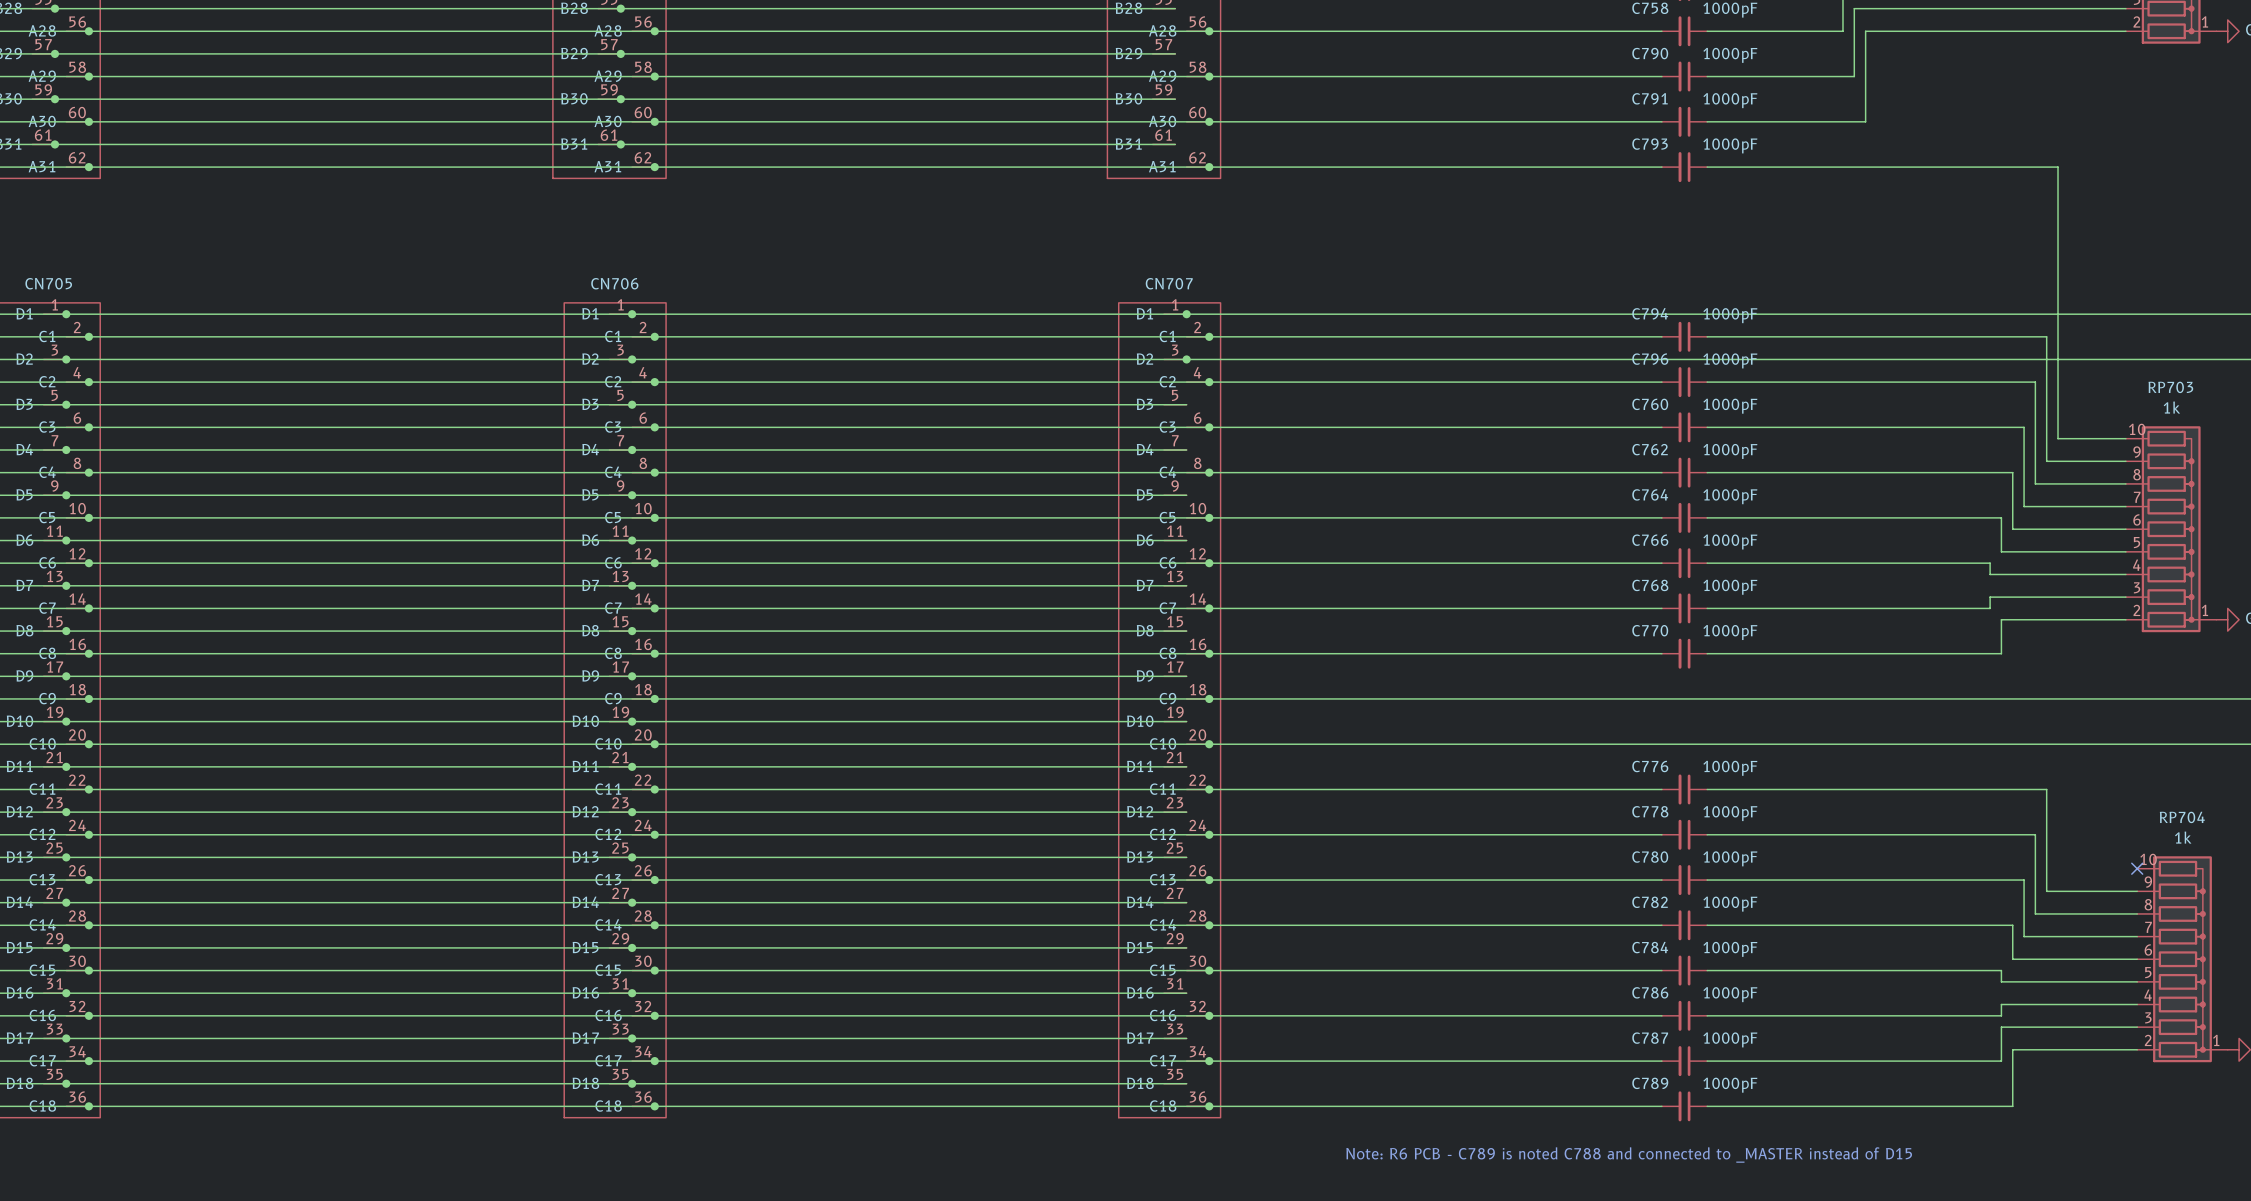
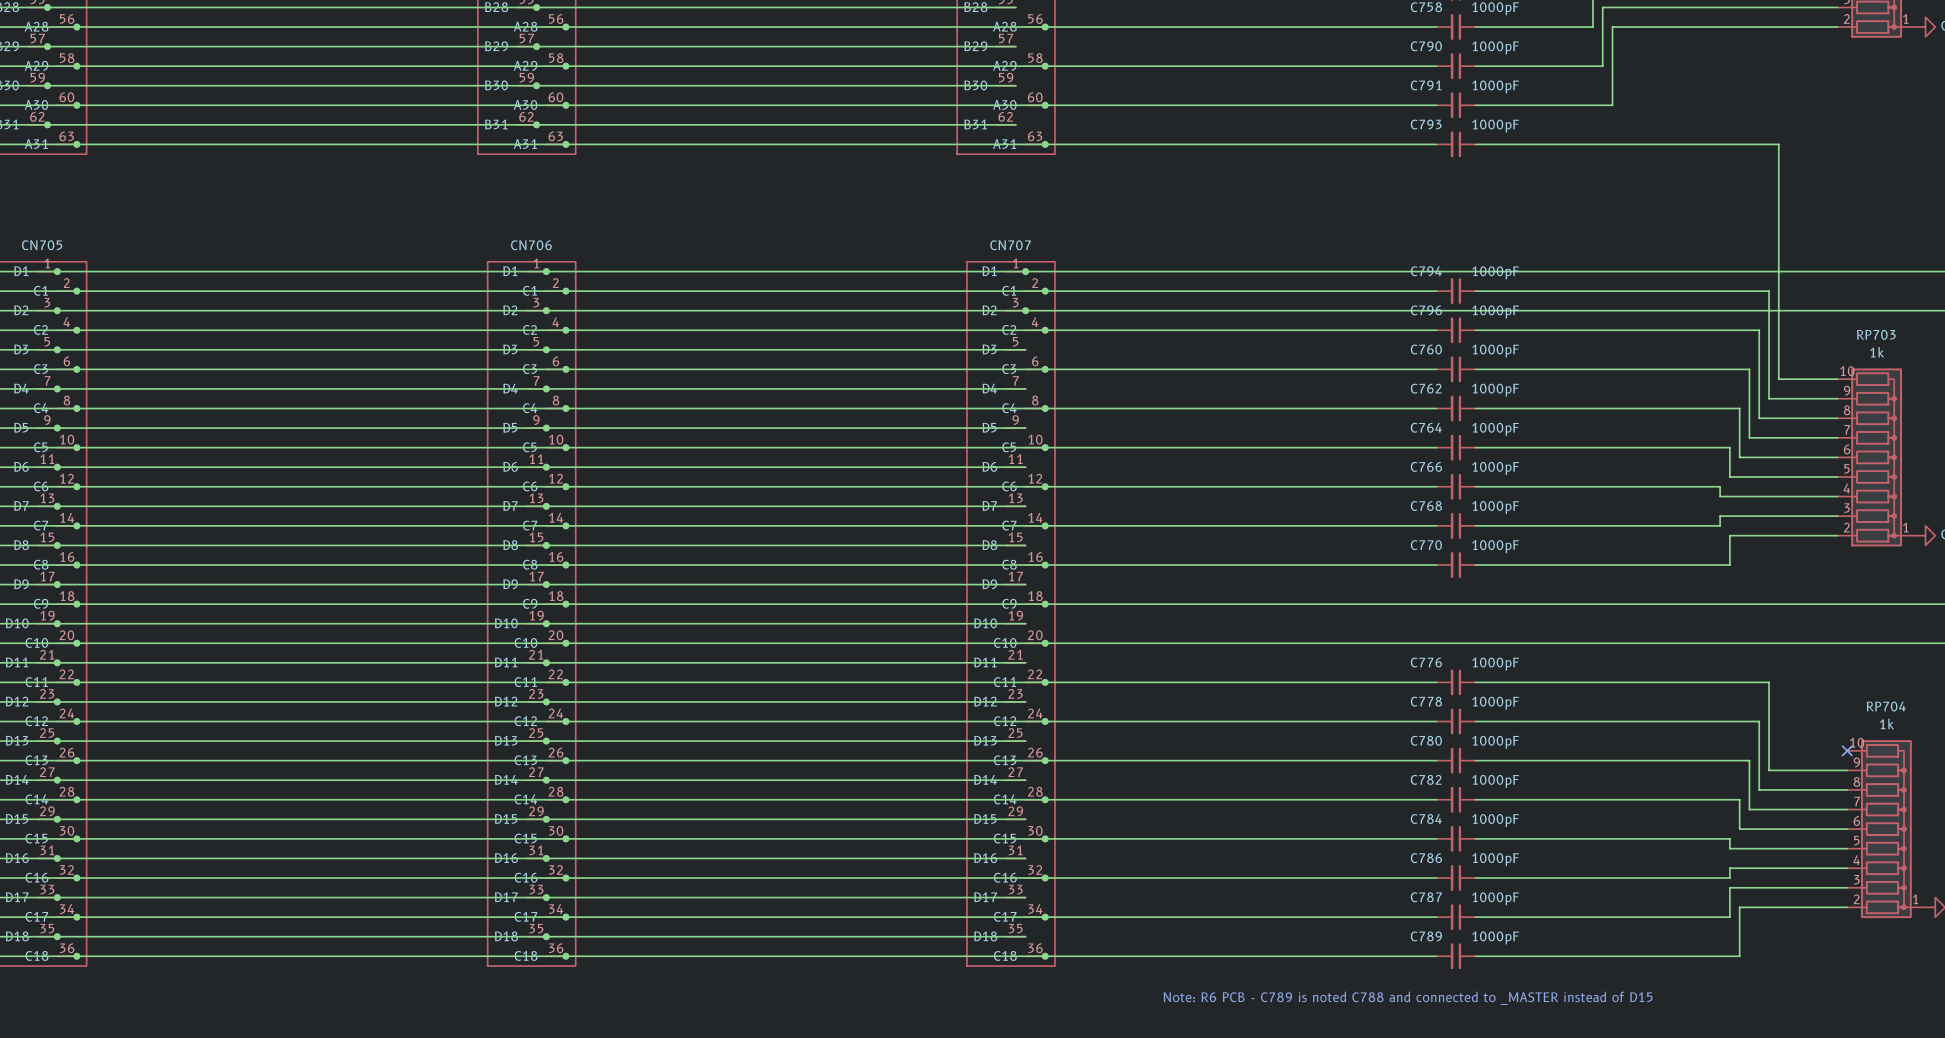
part pin number: 61 (43, 135) -> 62 (37, 116)
part pin number: 61 (609, 135) -> 62 (526, 116)
part pin number: 61 (1163, 135) -> 62 (1005, 116)
part pin number: 62 (77, 157) -> 63 (66, 136)
part pin number: 62 (642, 157) -> 63 (555, 136)
part pin number: 62 (1197, 157) -> 63 (1035, 136)

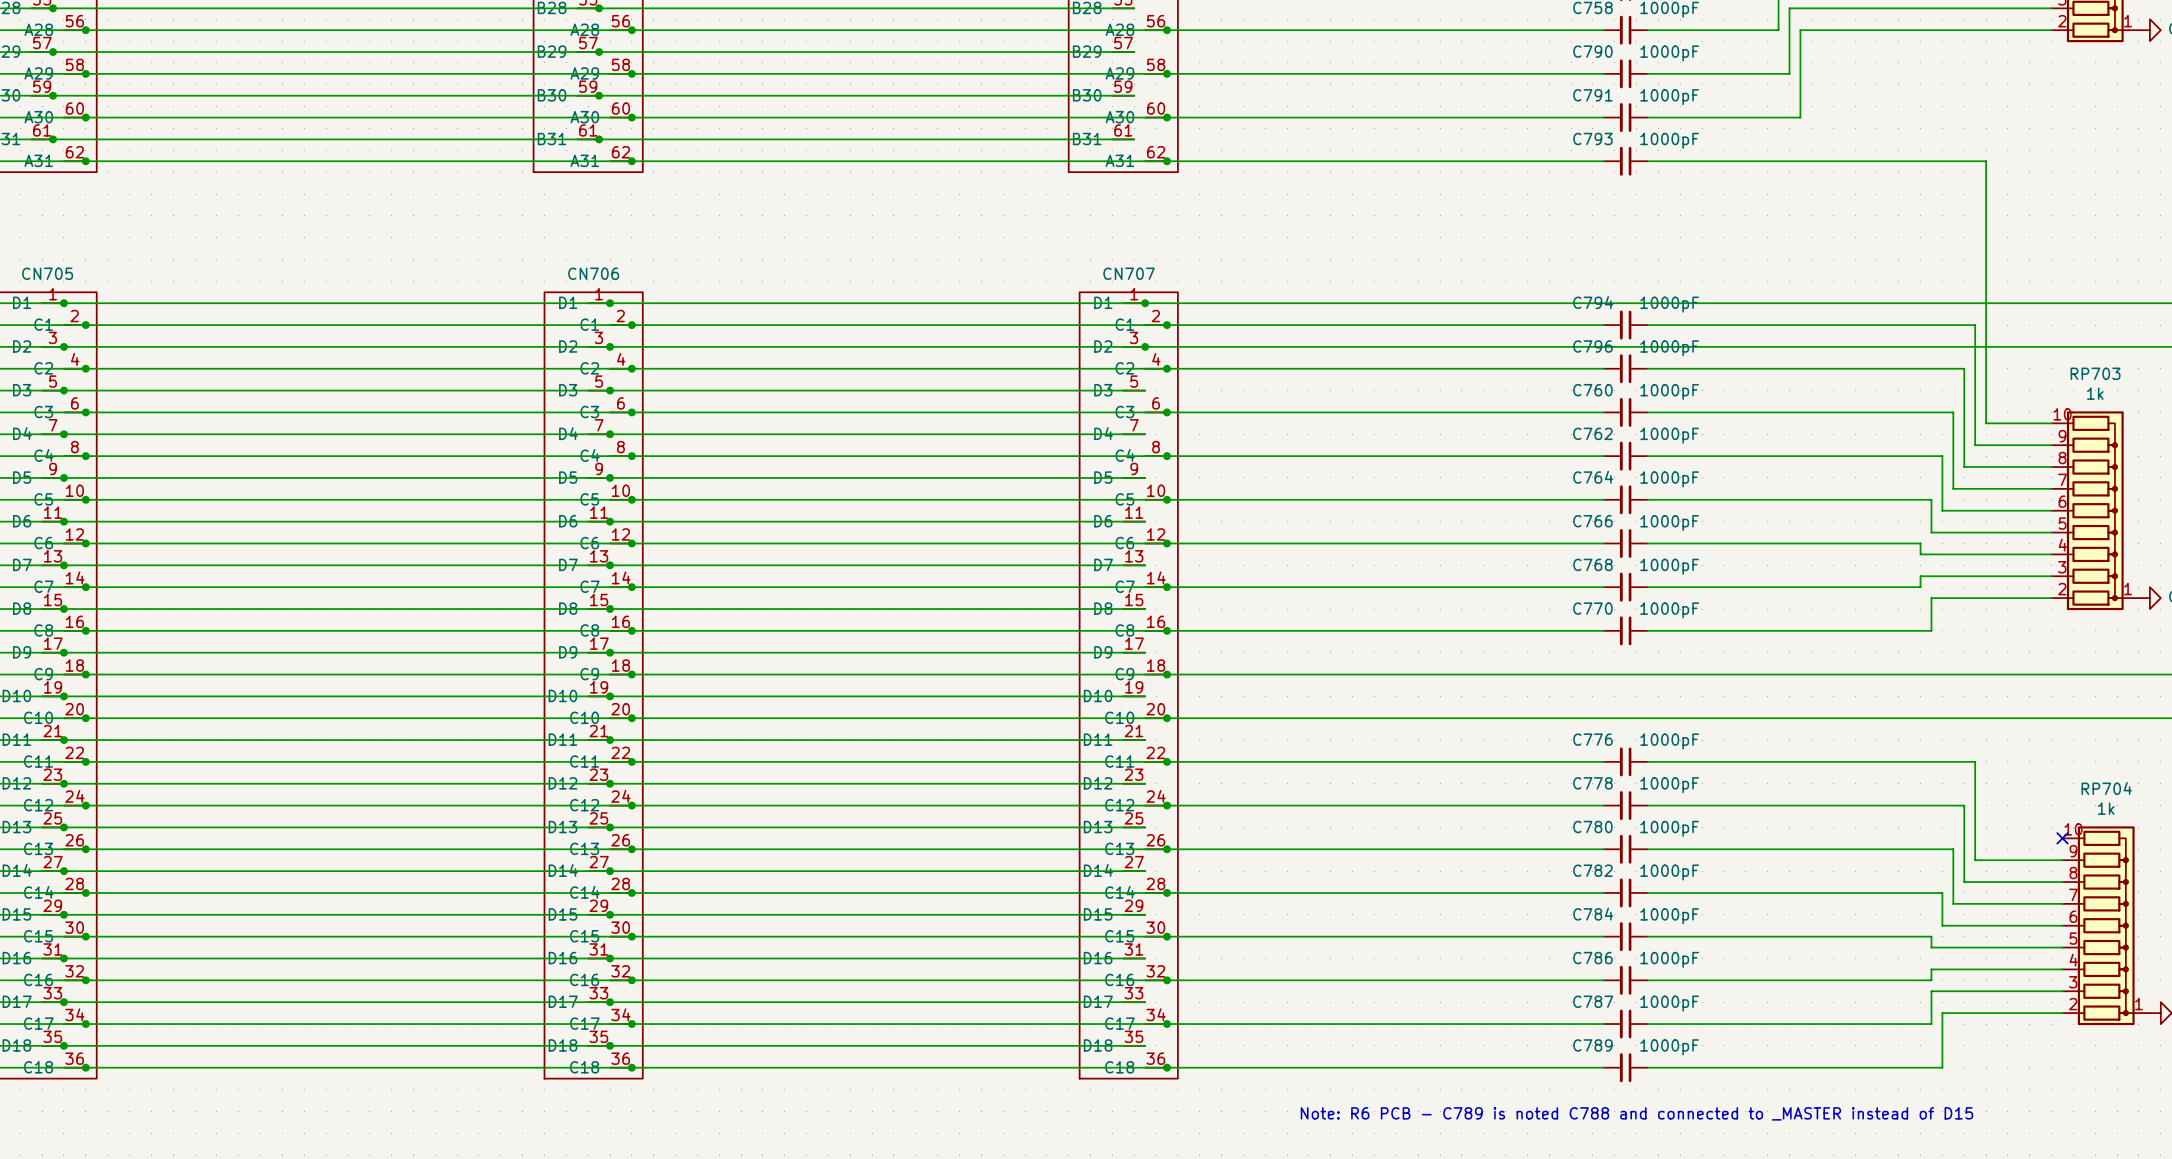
part pin number: 62 (37, 116) -> 61 (42, 130)
part pin number: 62 (526, 116) -> 61 (588, 130)
part pin number: 62 (1005, 116) -> 61 (1123, 130)
part pin number: 63 (66, 136) -> 62 (74, 152)
part pin number: 63 (555, 136) -> 62 (620, 152)
part pin number: 63 (1035, 136) -> 62 (1156, 152)

